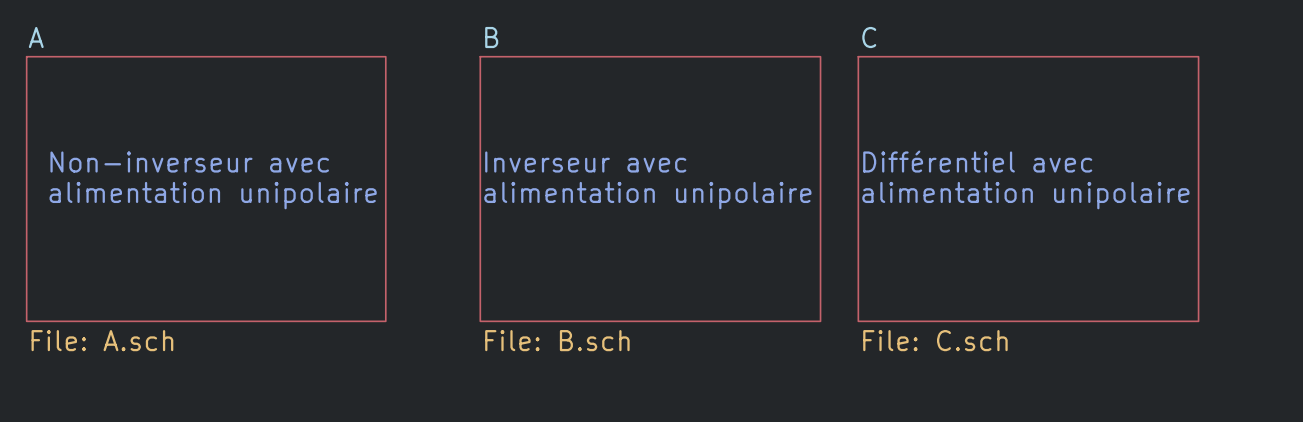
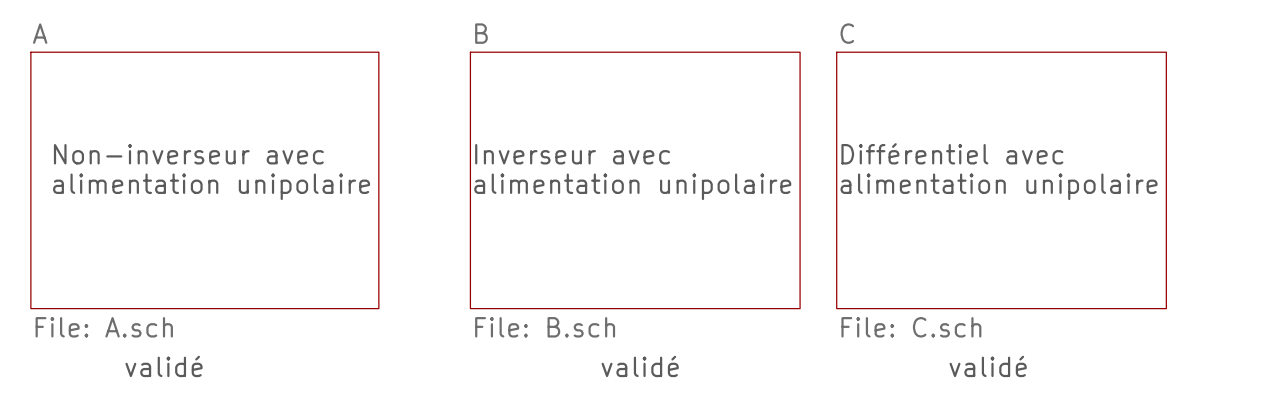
text: none -> validé (164, 366)
text: none -> validé (640, 366)
text: none -> validé (988, 366)

